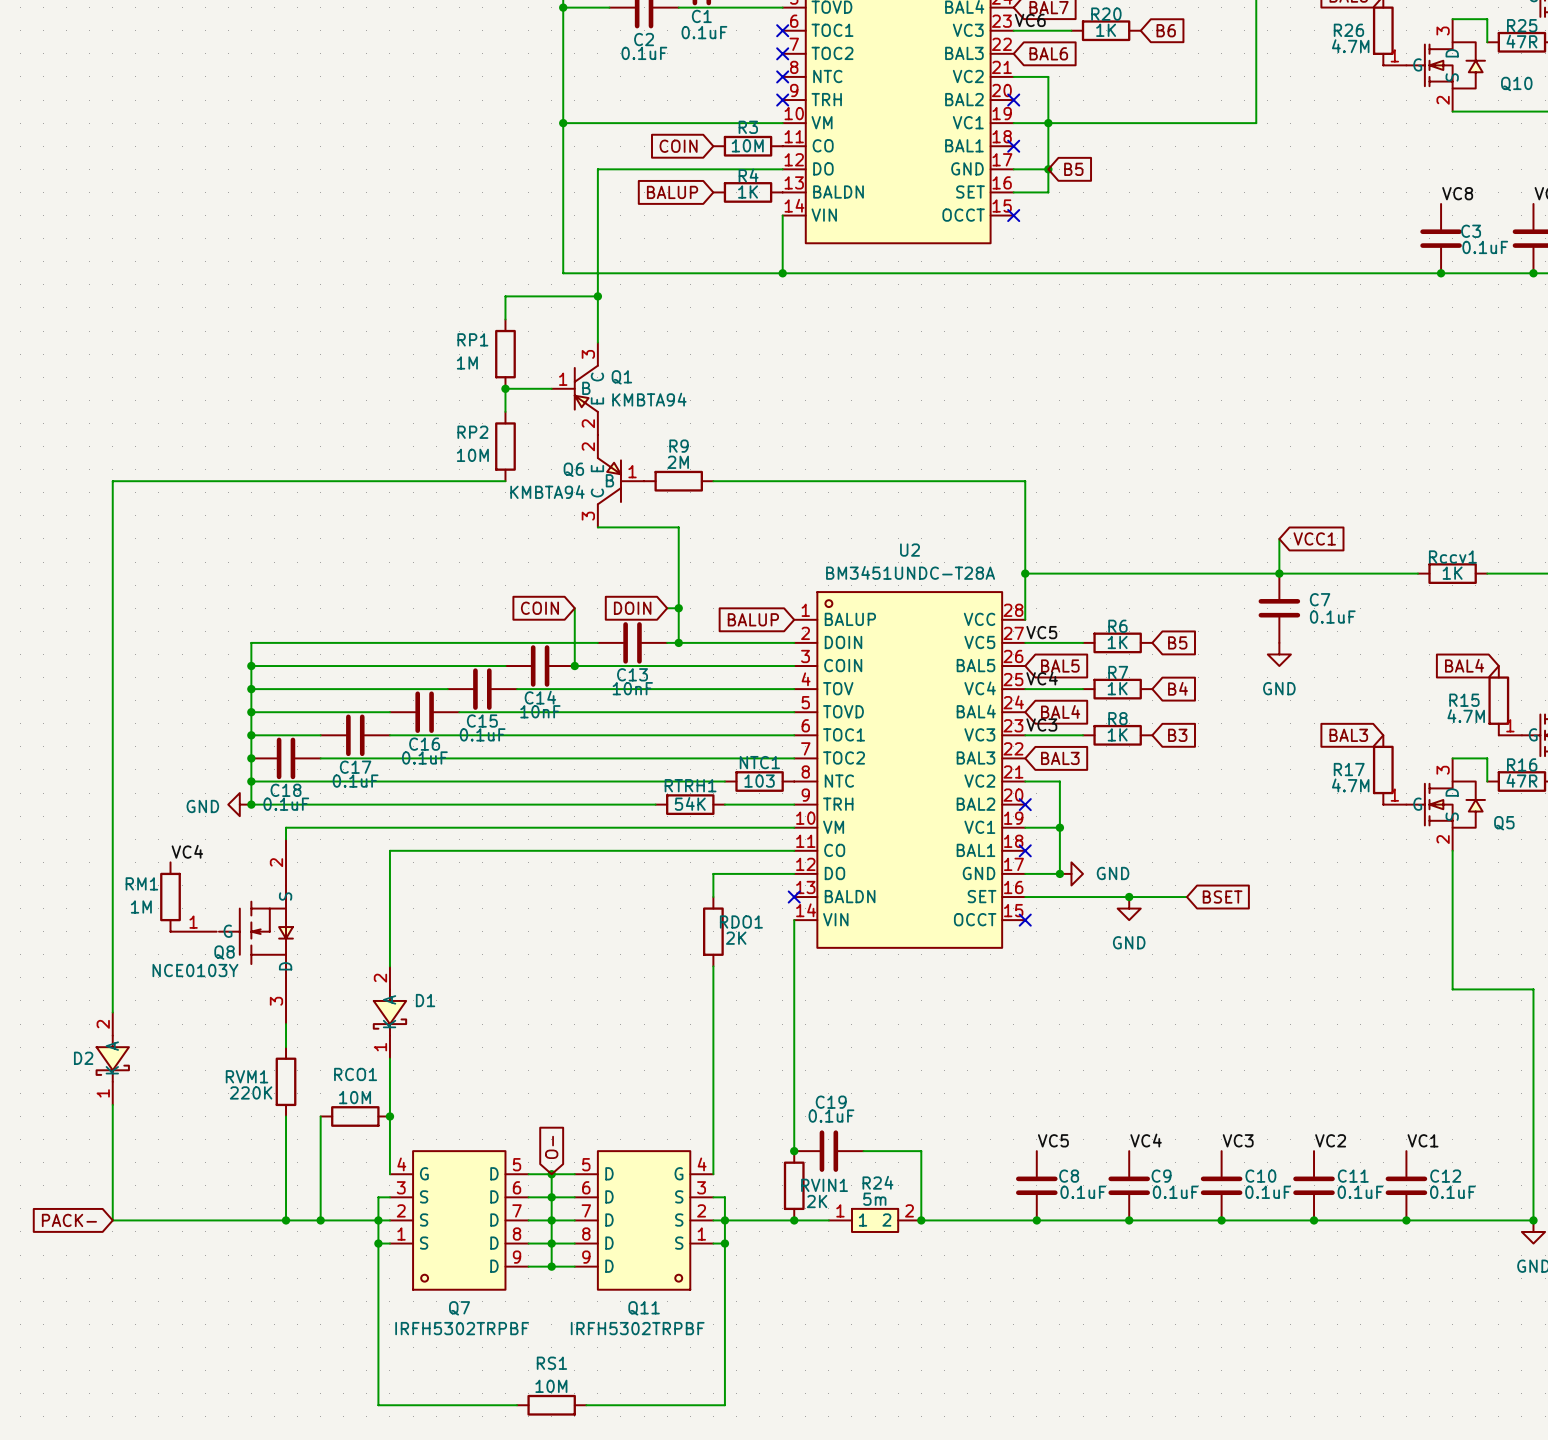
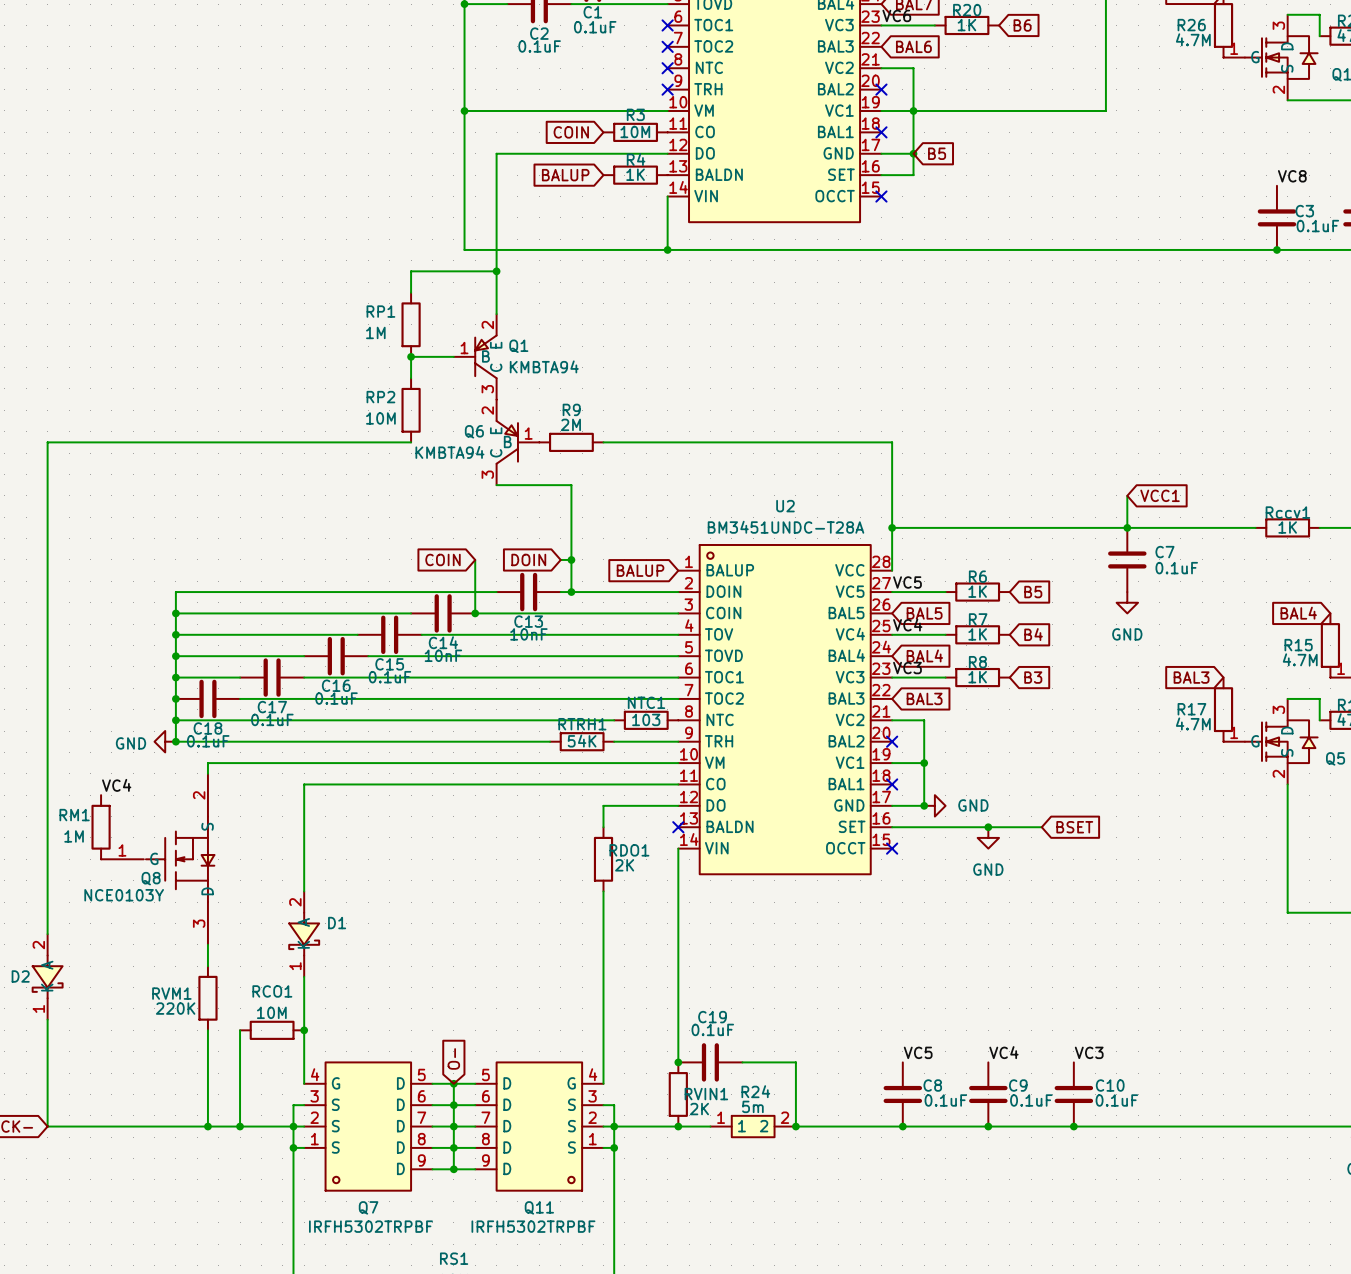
Q1 flip: as is (586, 388) -> up-down (485, 356)
label: VC2 (1330, 1140) -> none
label: VC1 (1423, 1140) -> none
C11: 0.1uF (1314, 1185) -> none
C12: 0.1uF (1406, 1185) -> none
junction: (1314, 1220) -> none
junction: (1406, 1220) -> none

